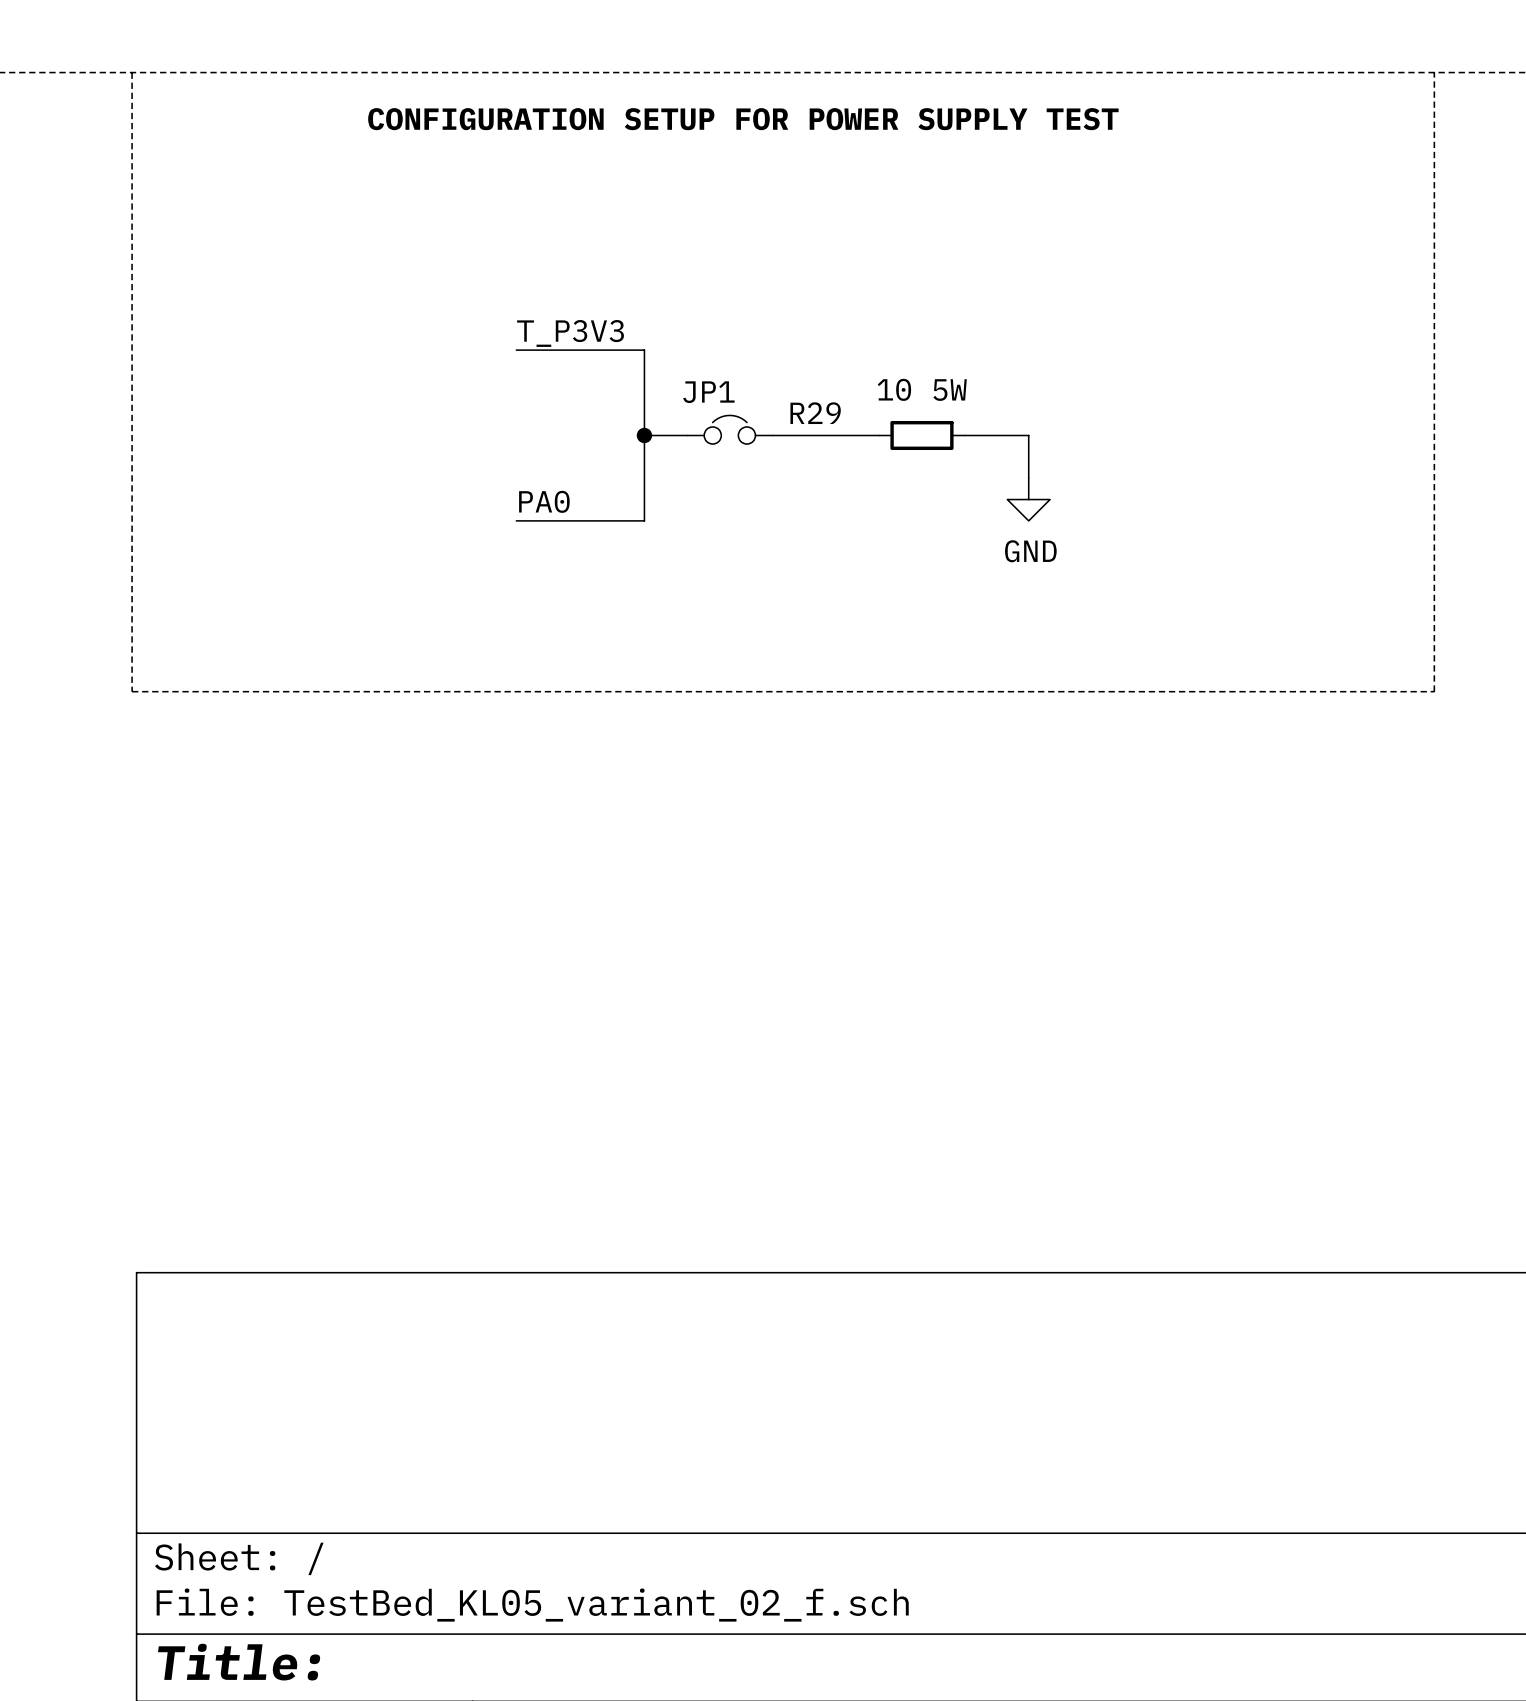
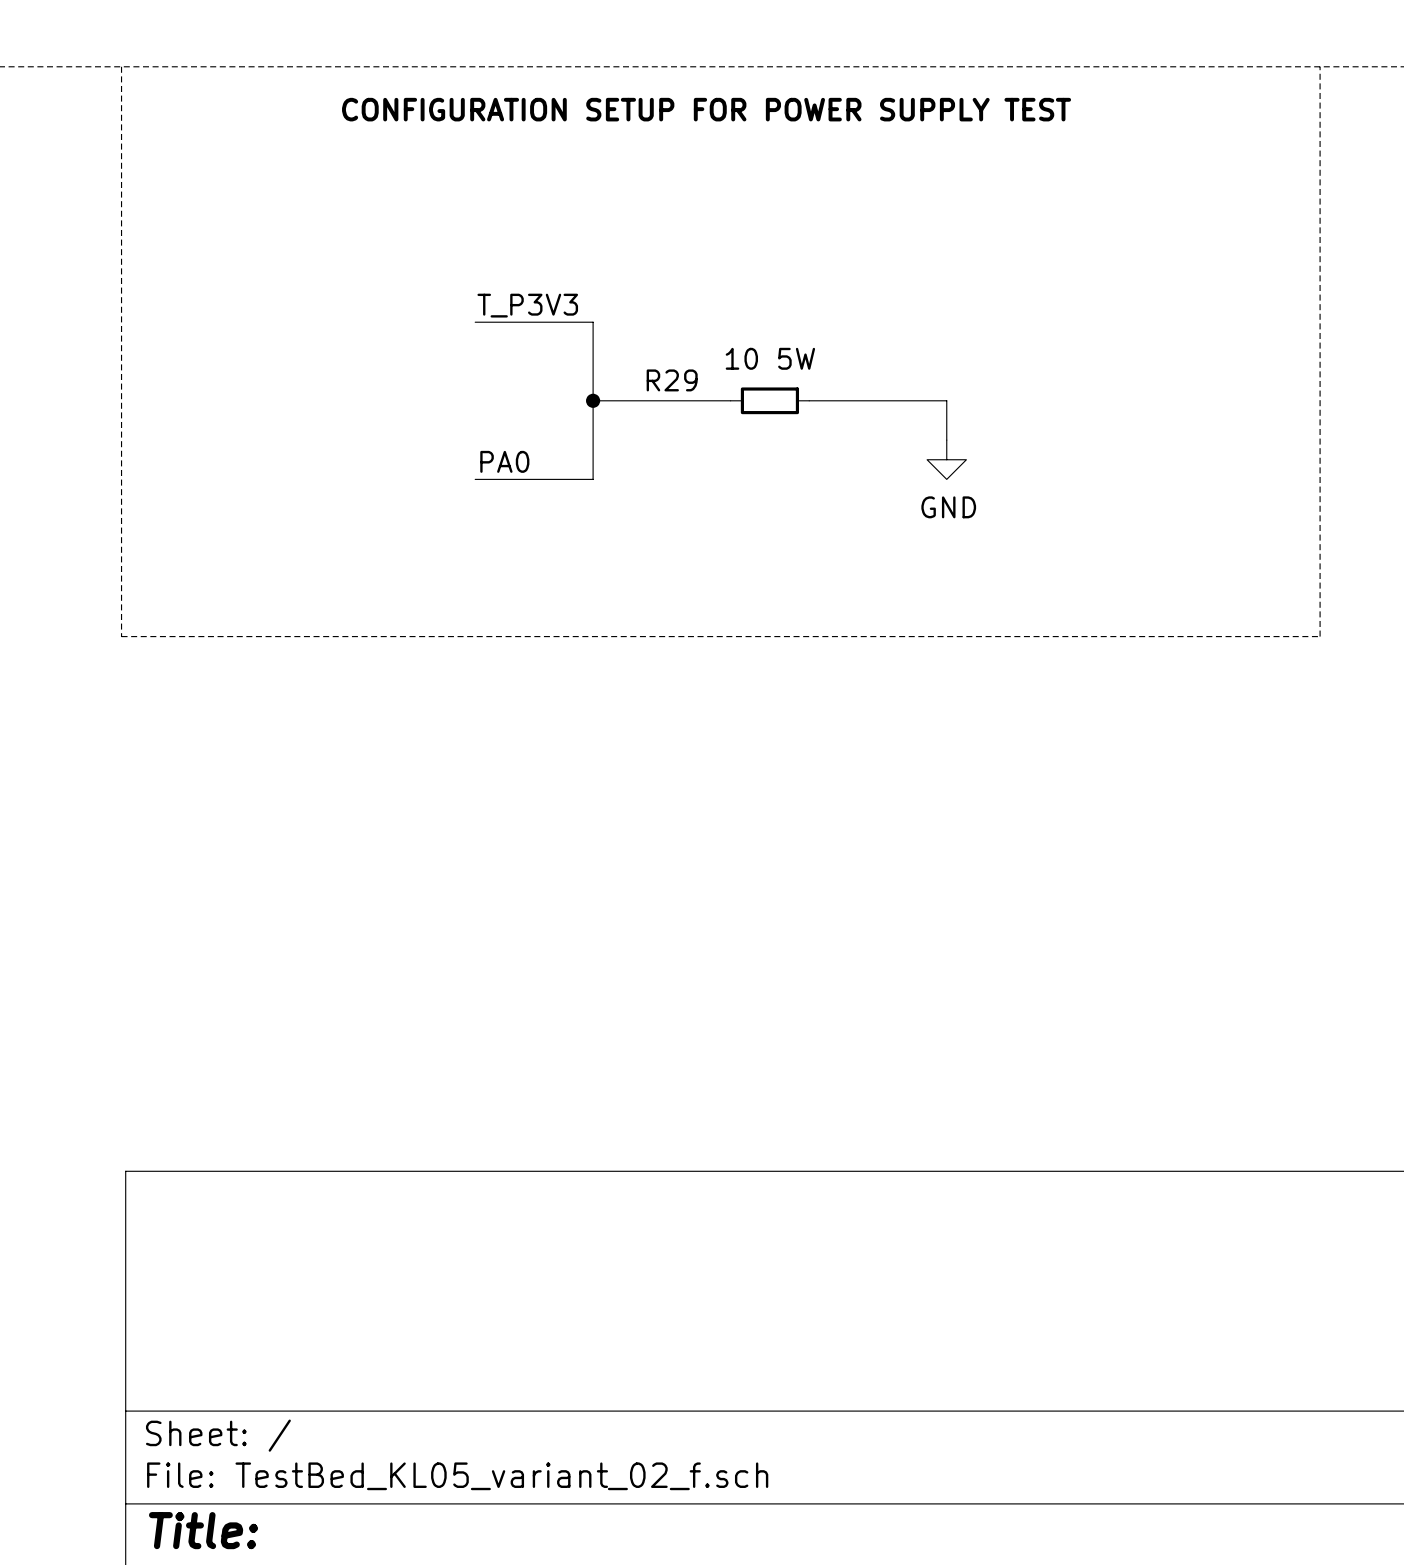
JP1: (729, 429) -> none
wire: none -> (632, 400) (710, 400)
wire: (793, 435) (879, 435) -> (887, 400) (809, 400)
R29 position: (921, 435) -> (769, 400)

